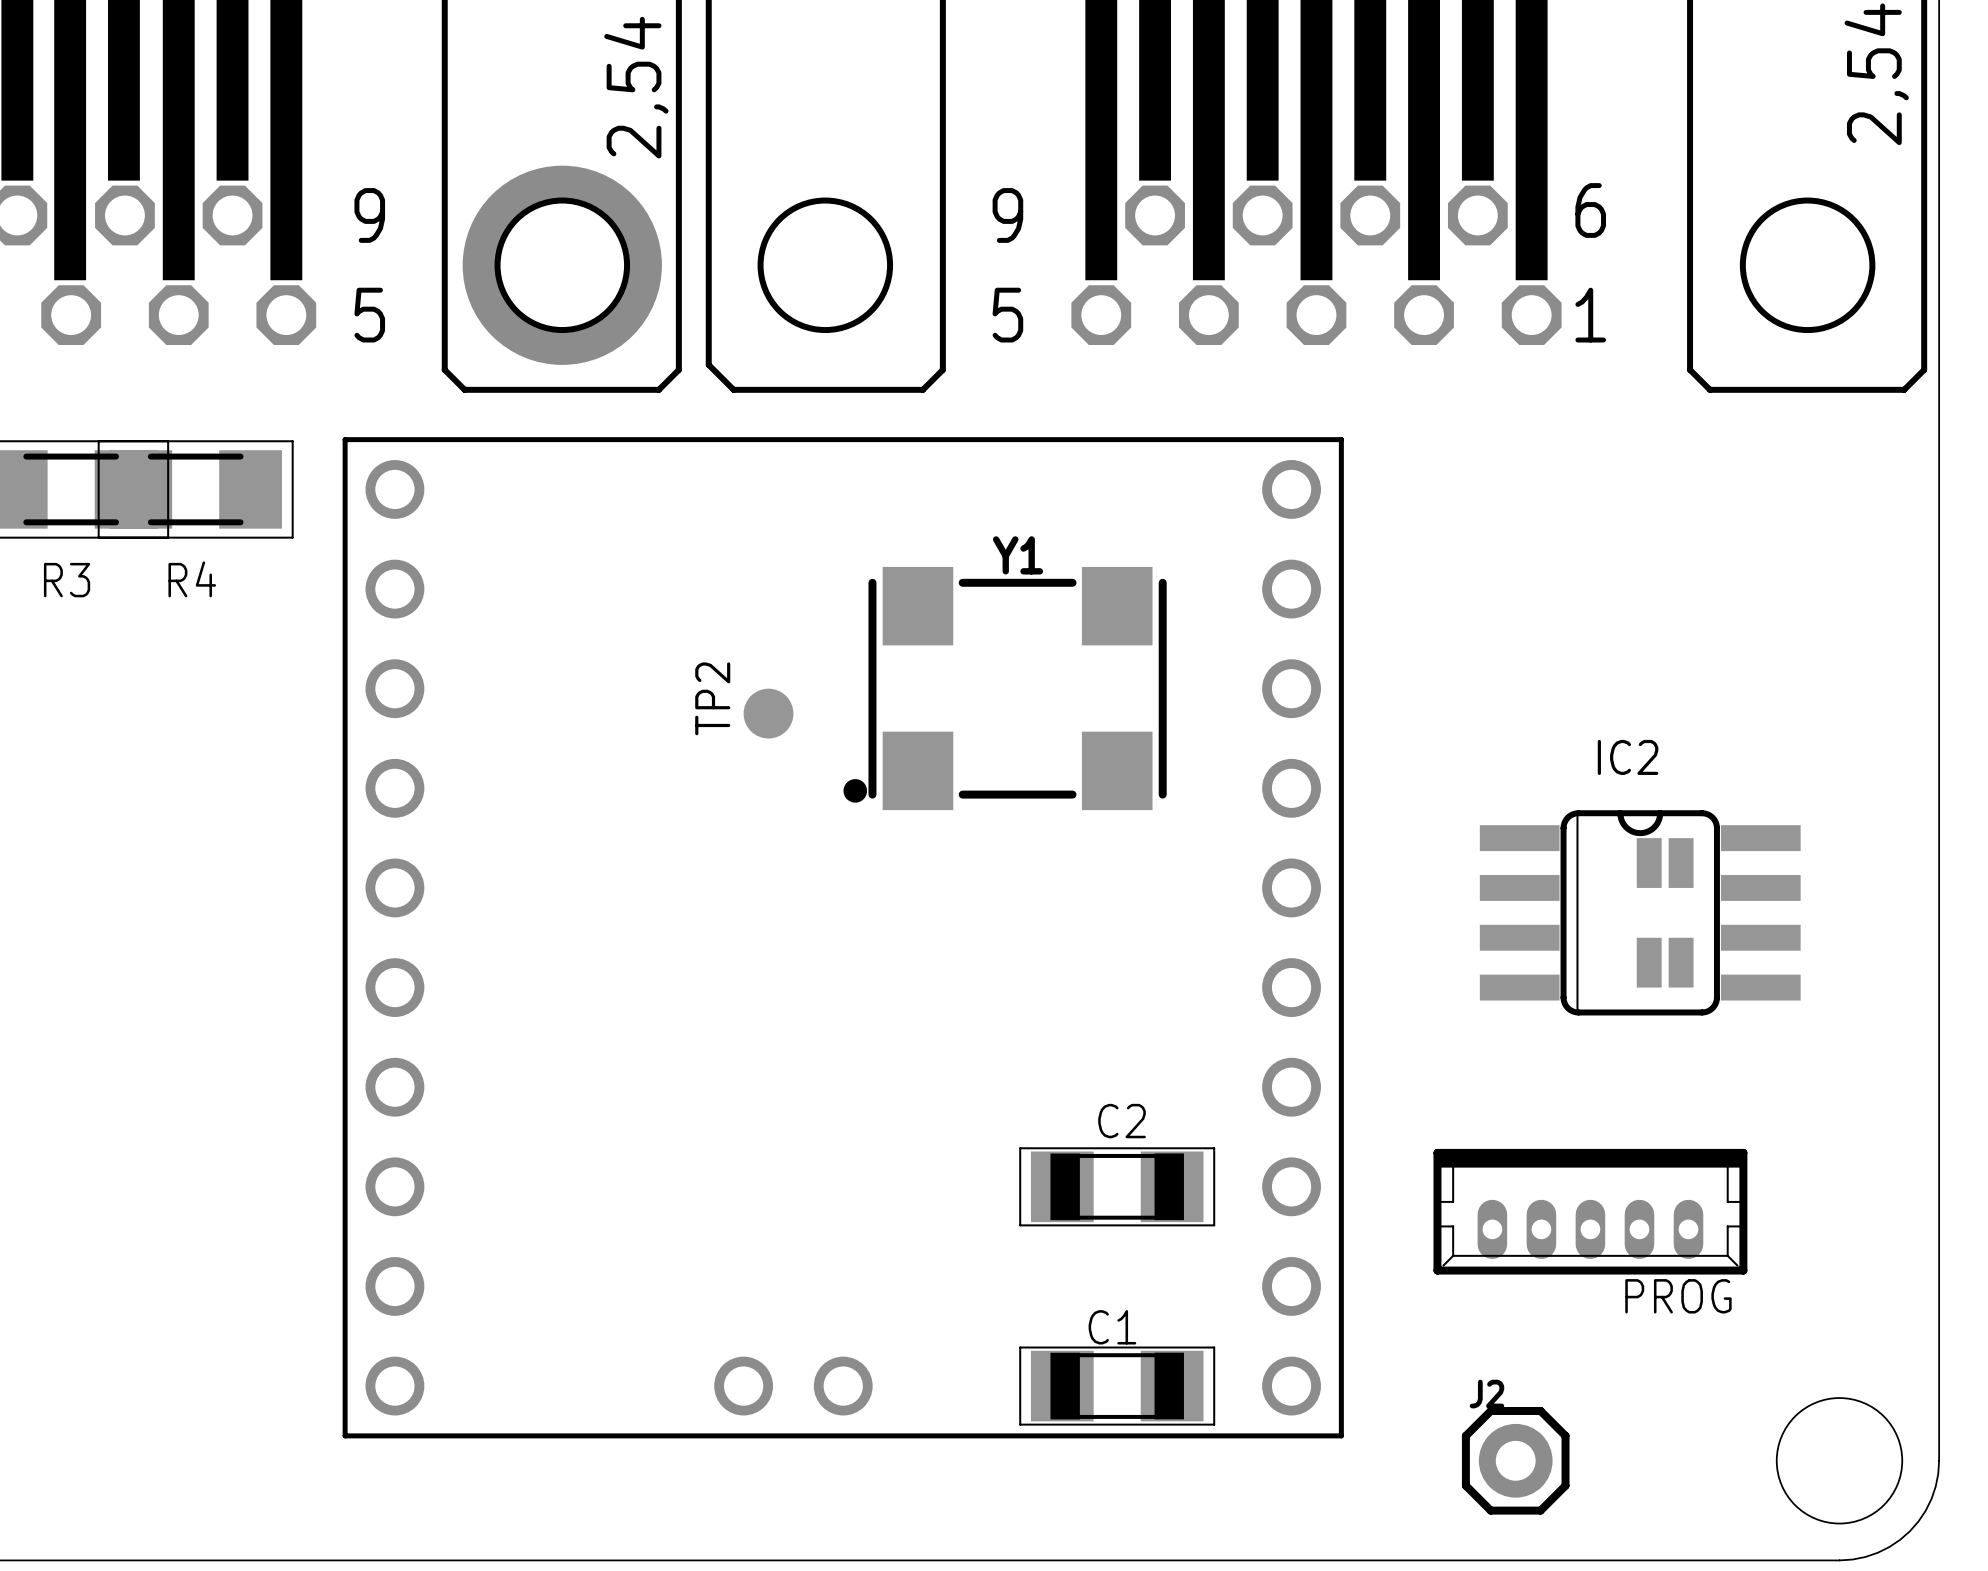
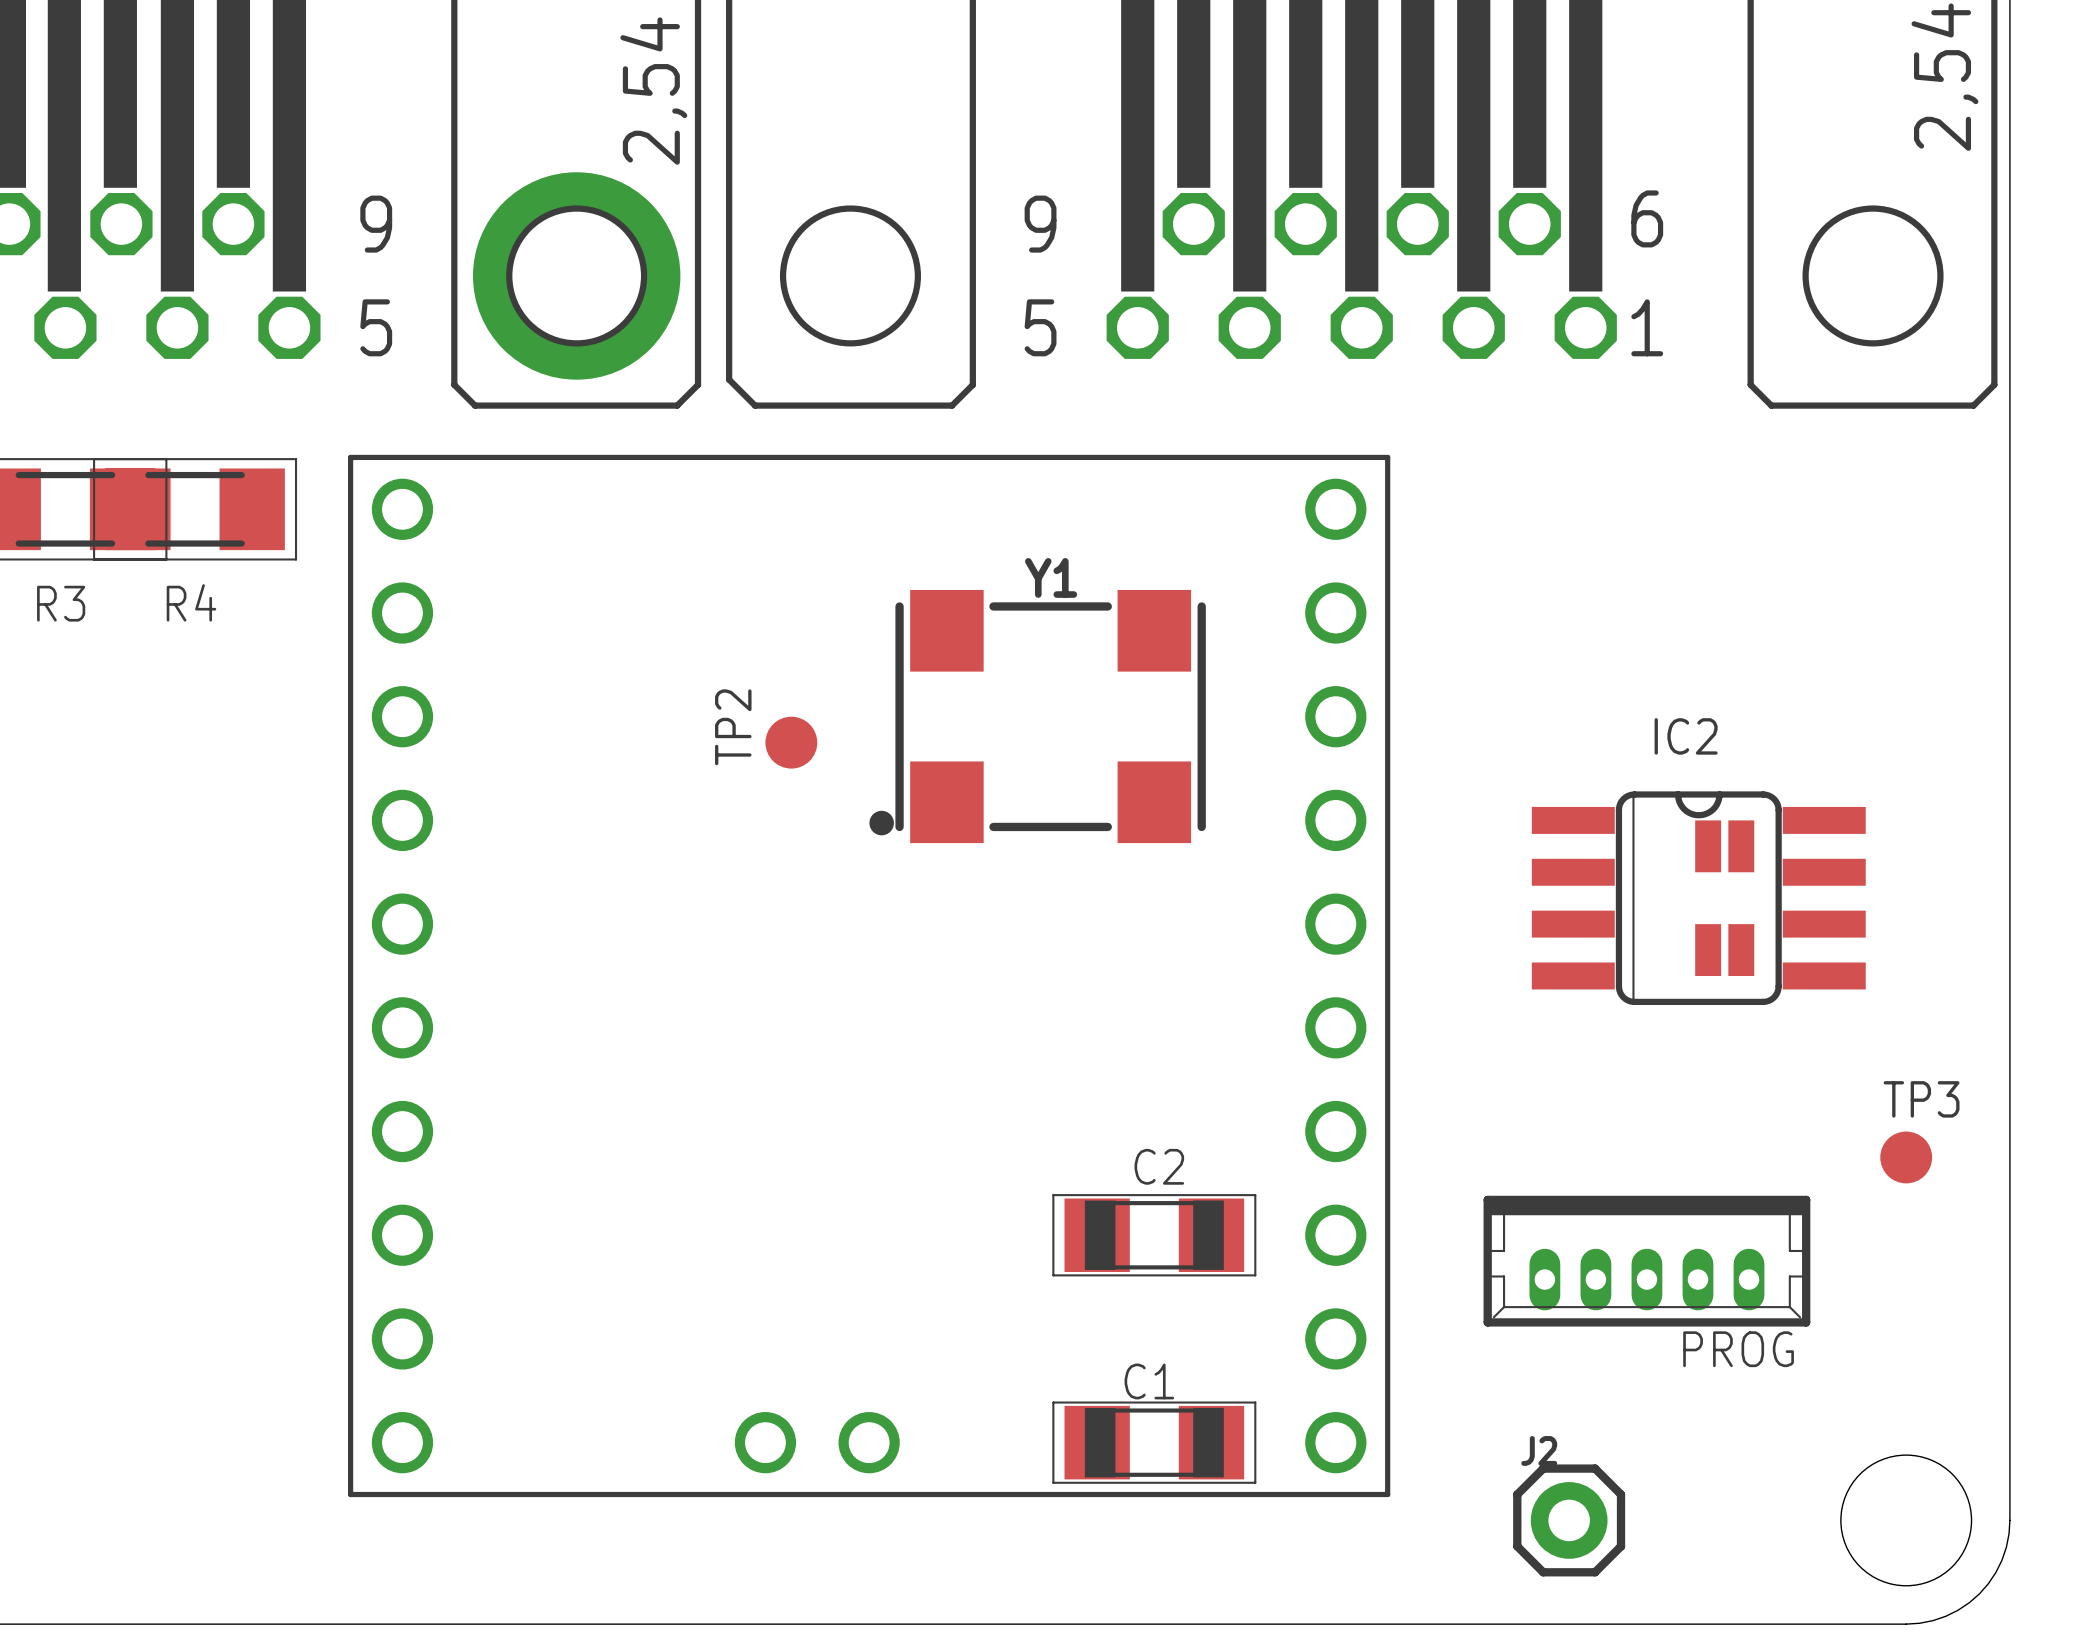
part: none -> (1724, 846)
part: (1665, 863) -> none
IC2 position: (1640, 912) -> (1698, 898)
part: none -> (1724, 950)
part: (1665, 962) -> none
TP3: none -> (1906, 1157)

